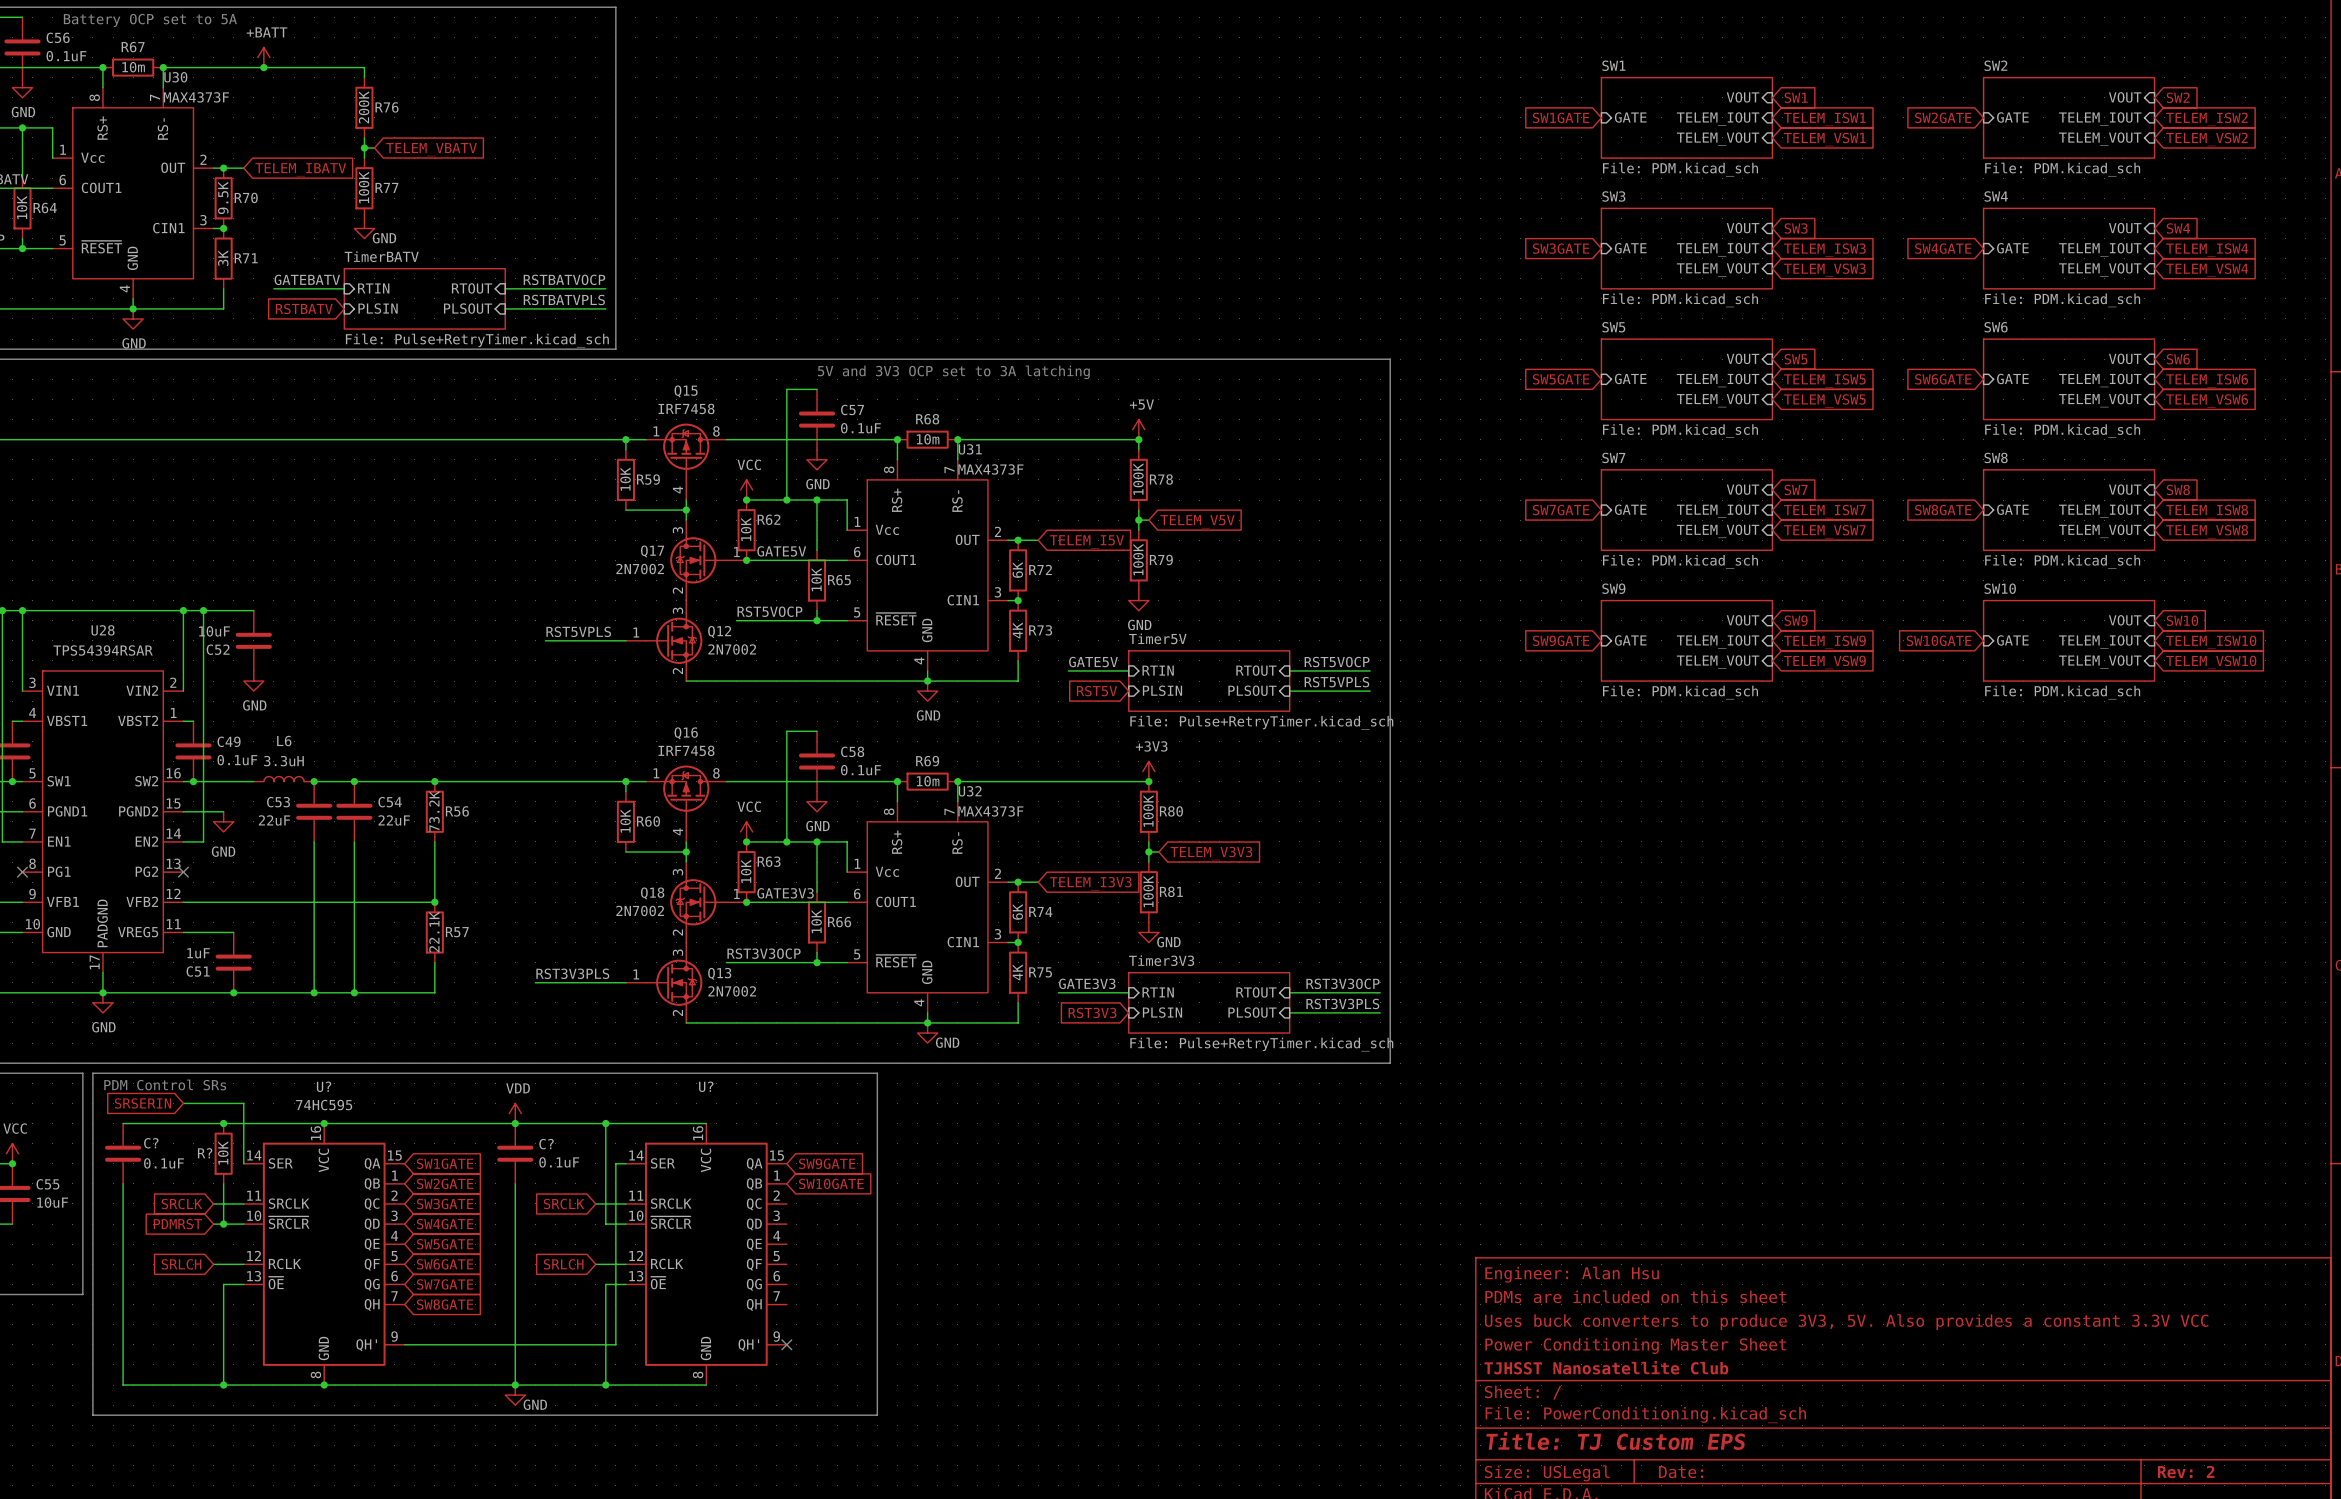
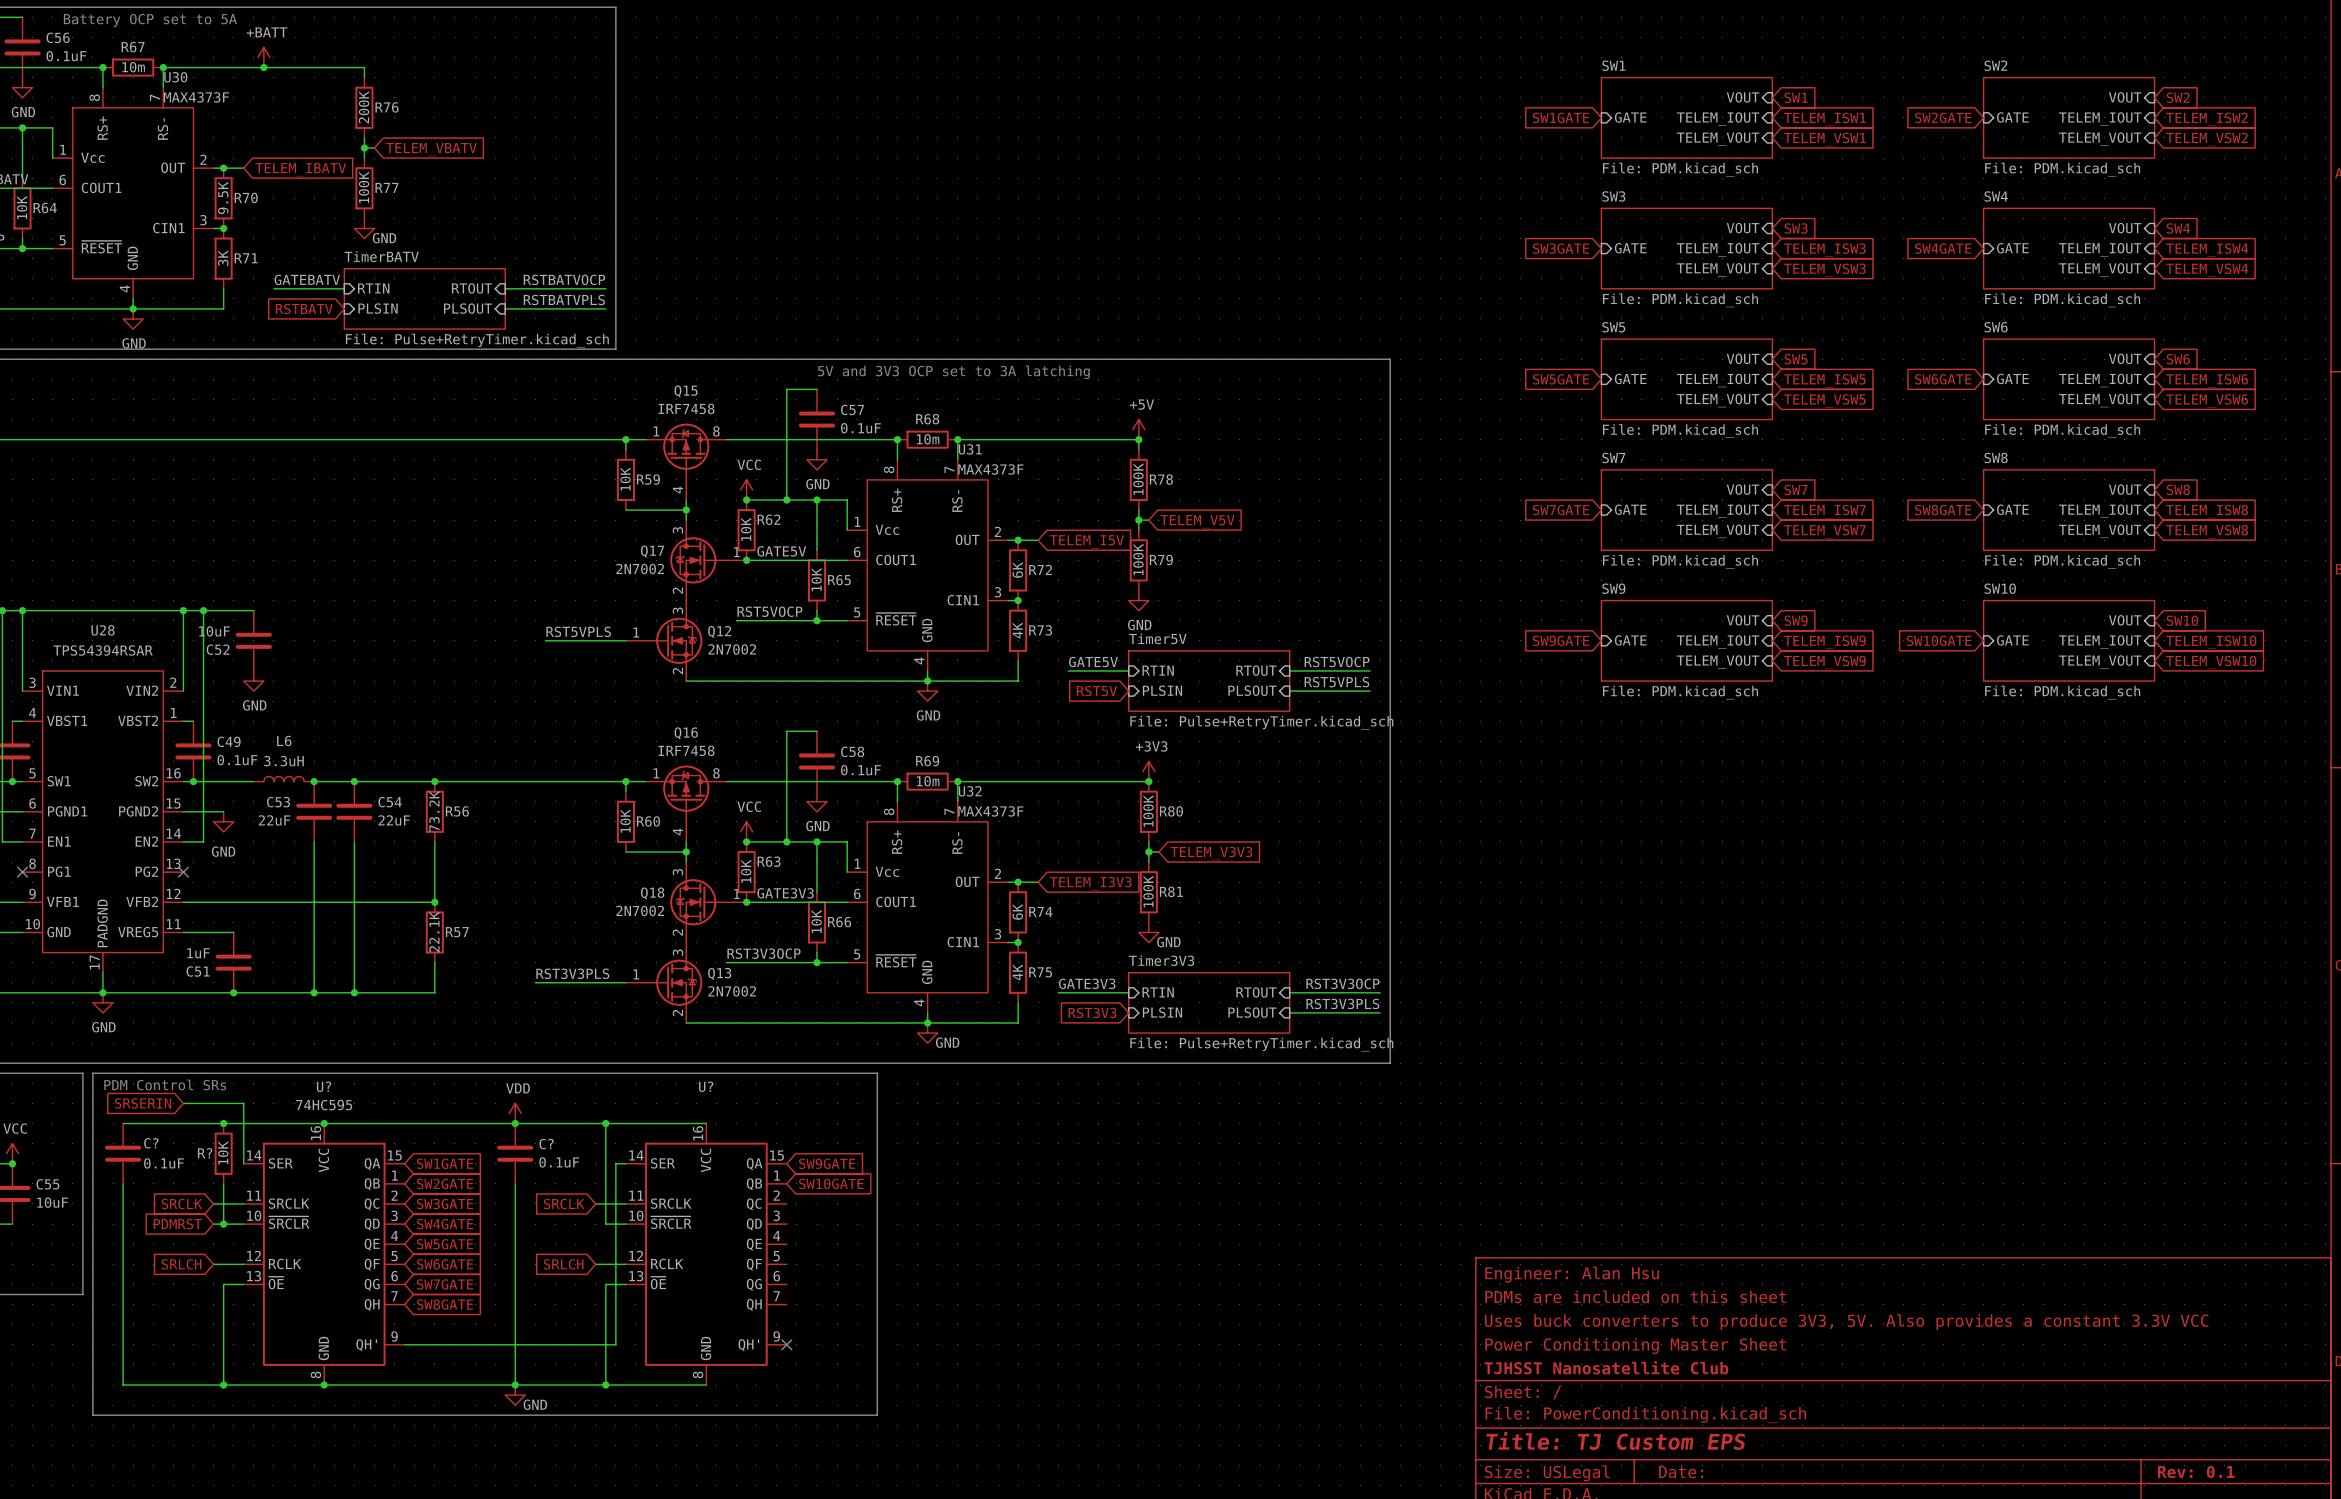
title block: Rev: 2 (2186, 1472) -> Rev: 0.1 (2196, 1472)

